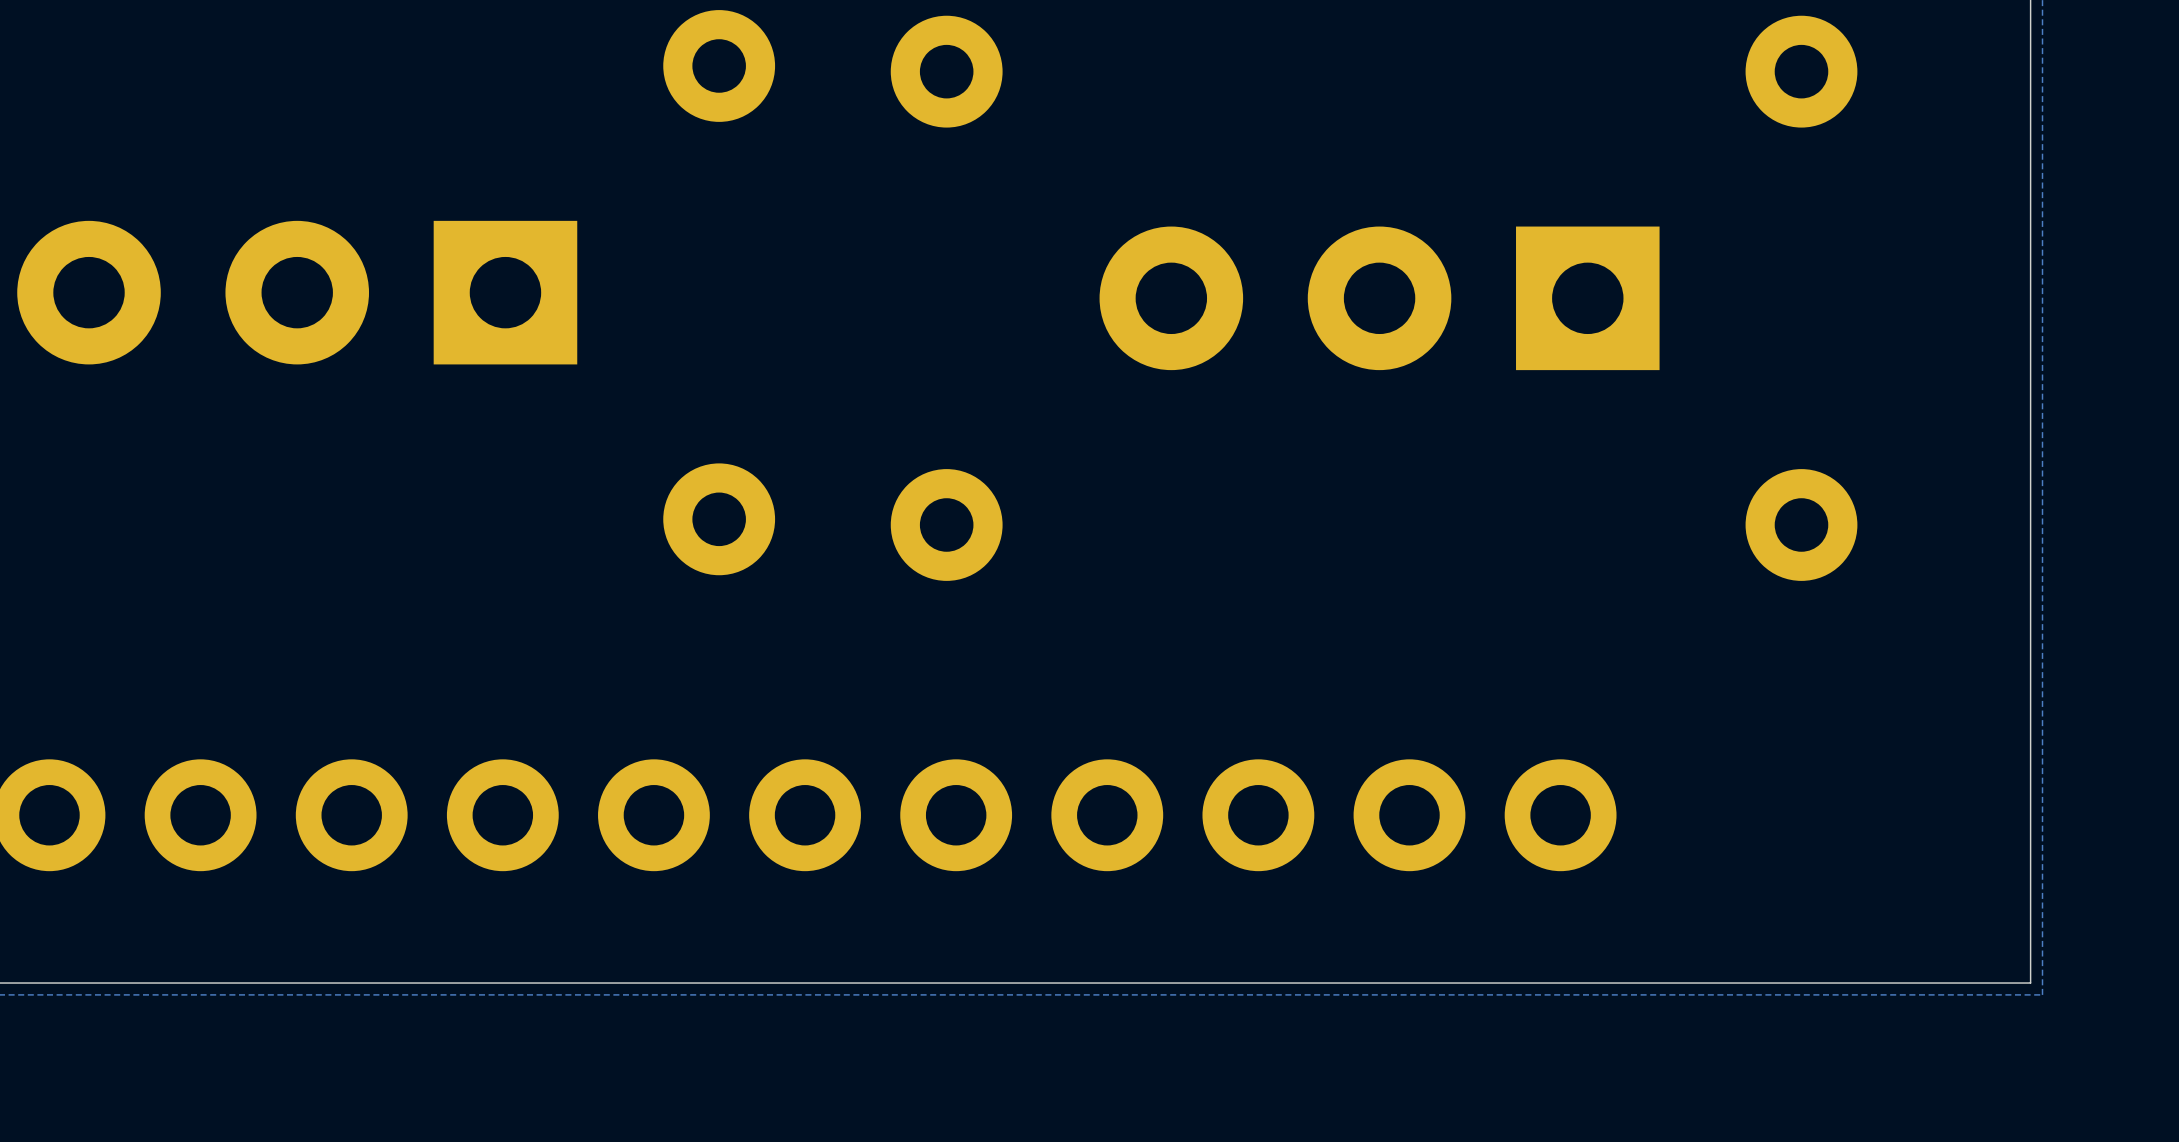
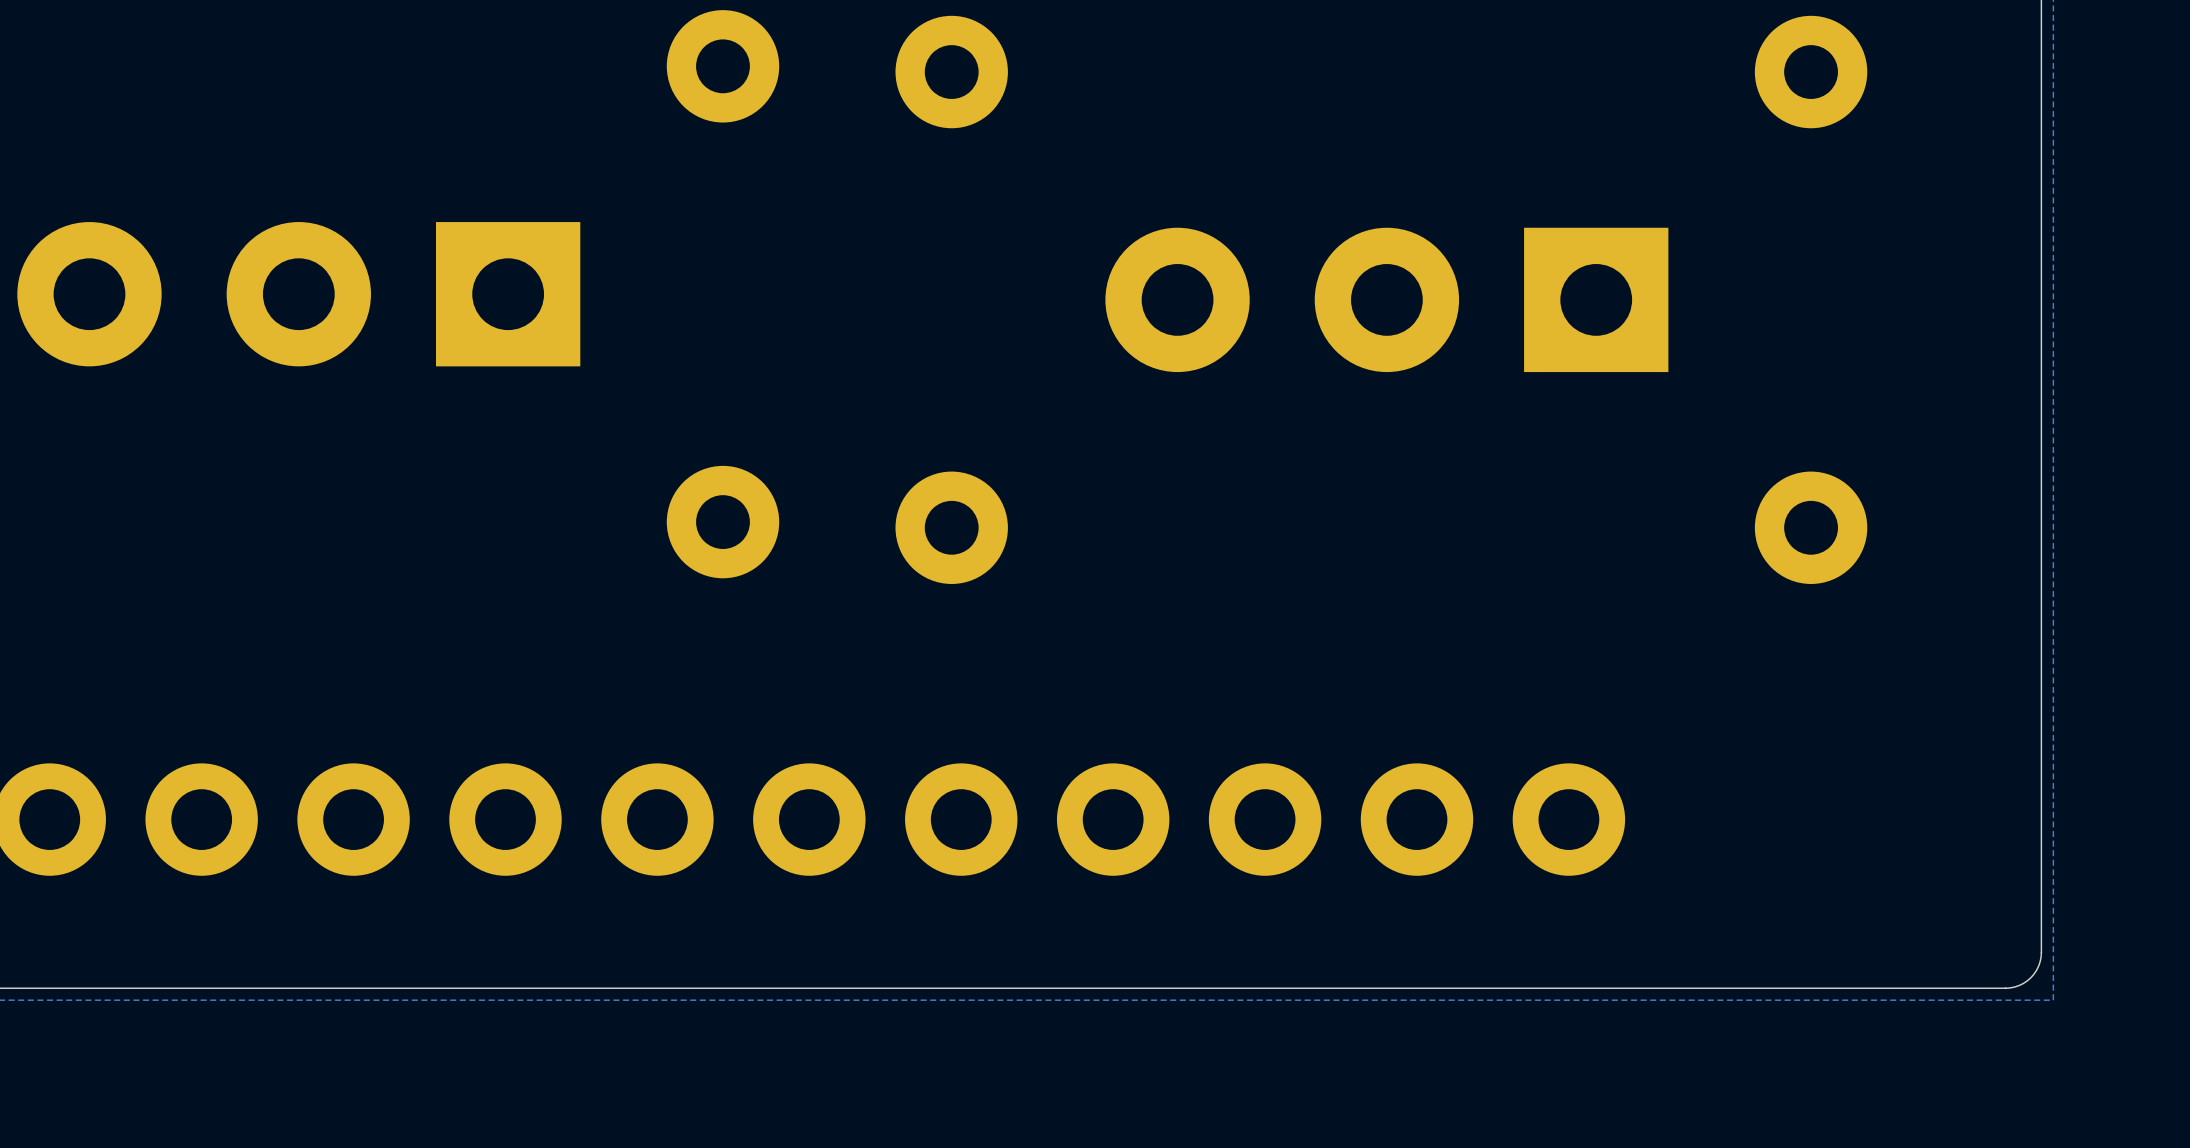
board edge: (2030, 947) (2030, 983) (1994, 983) -> (2041, 952) (2038, 966) (2030, 977) (2019, 985) (2005, 988)

